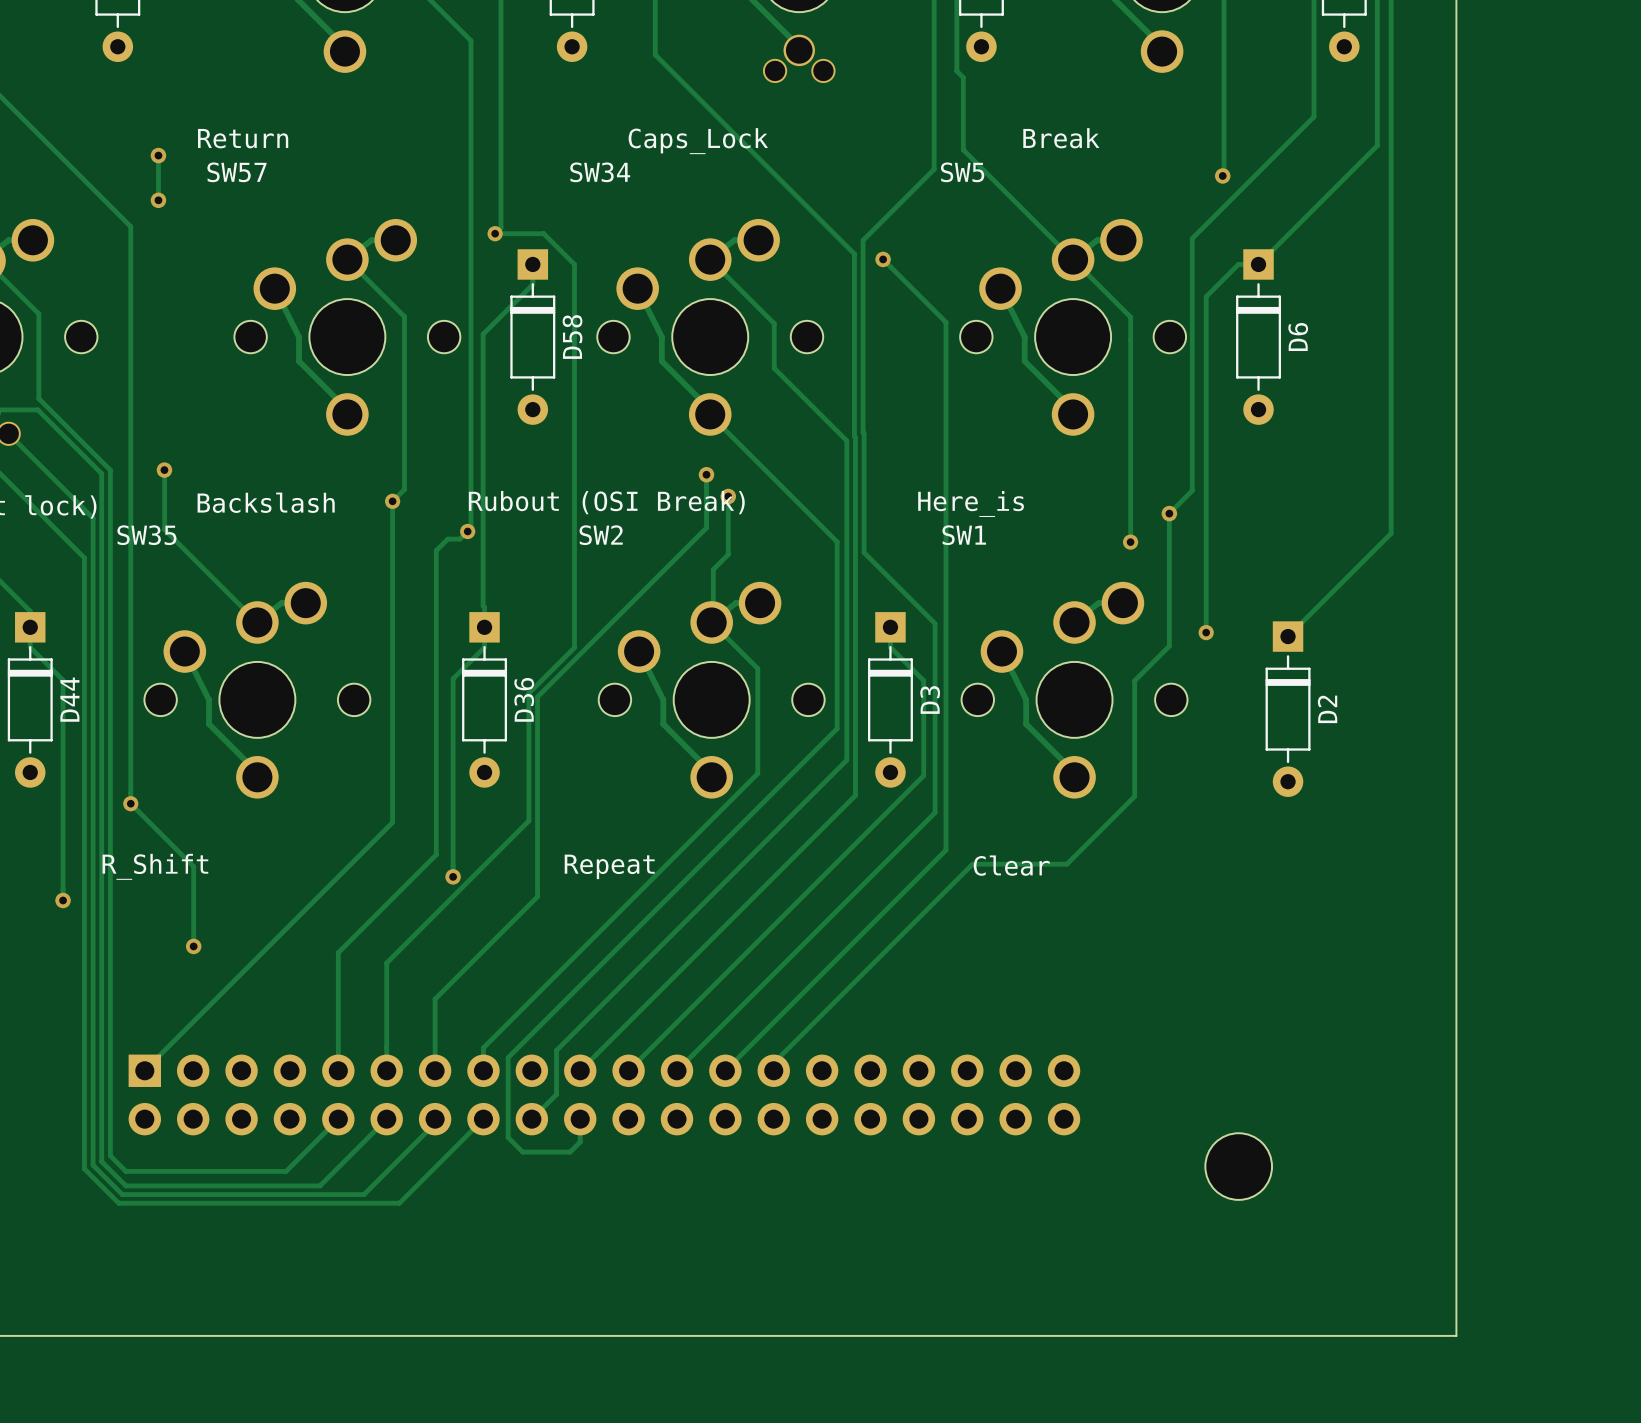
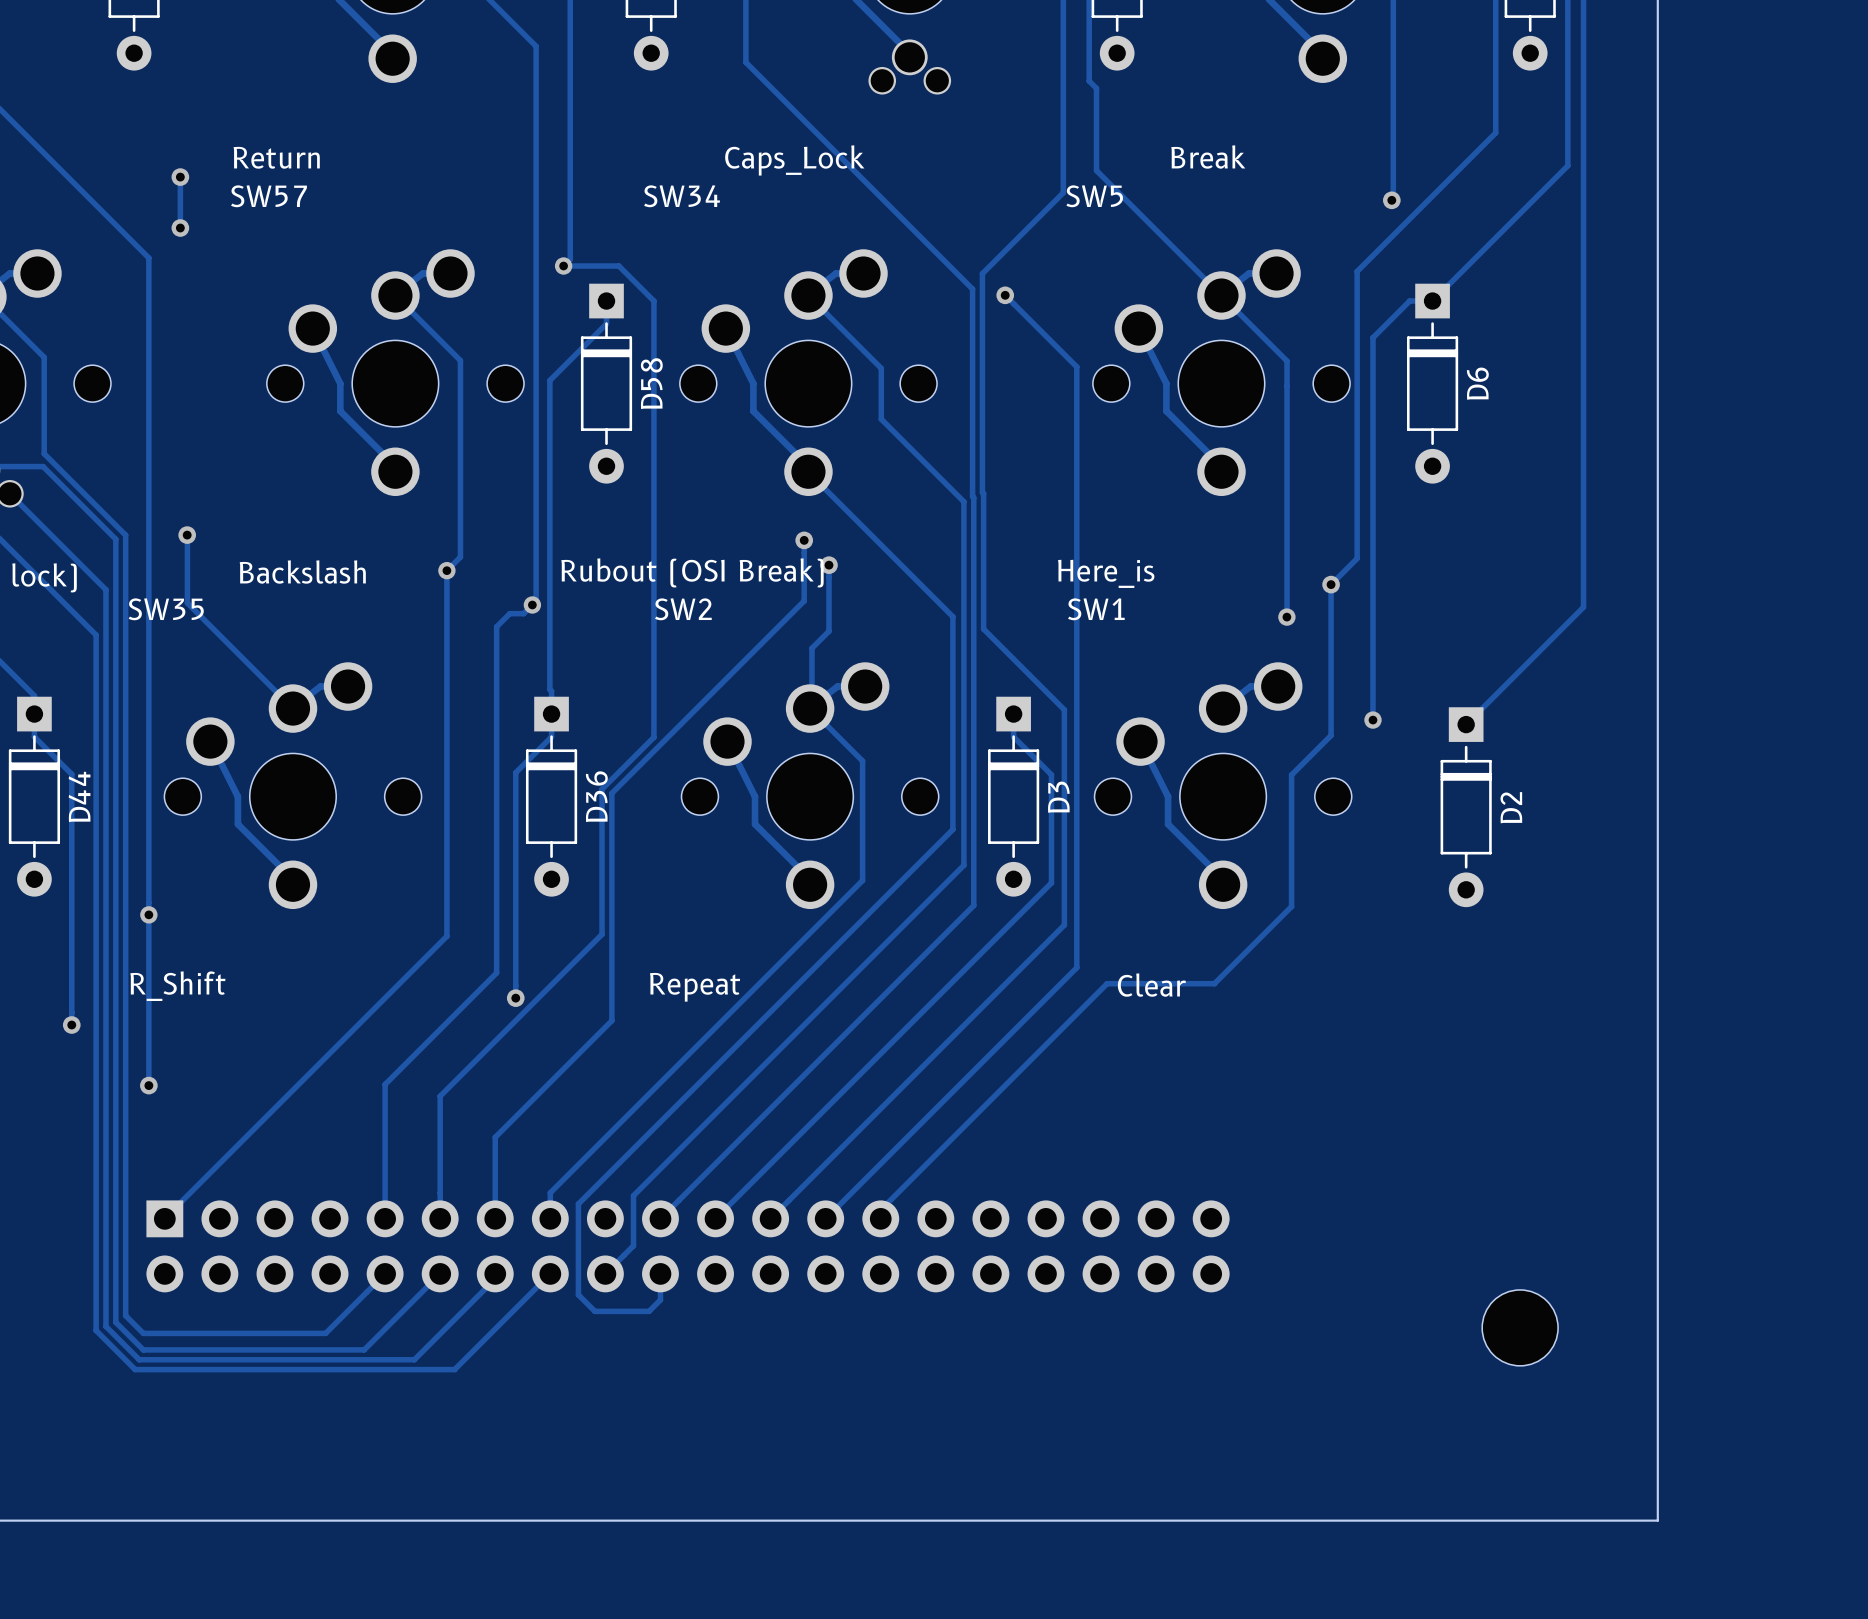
track: (130, 803) (193, 866) (193, 946) -> (148, 914) (148, 1085)
via position: (193, 946) -> (148, 1085)
part position: (1238, 1166) -> (1520, 1327)

